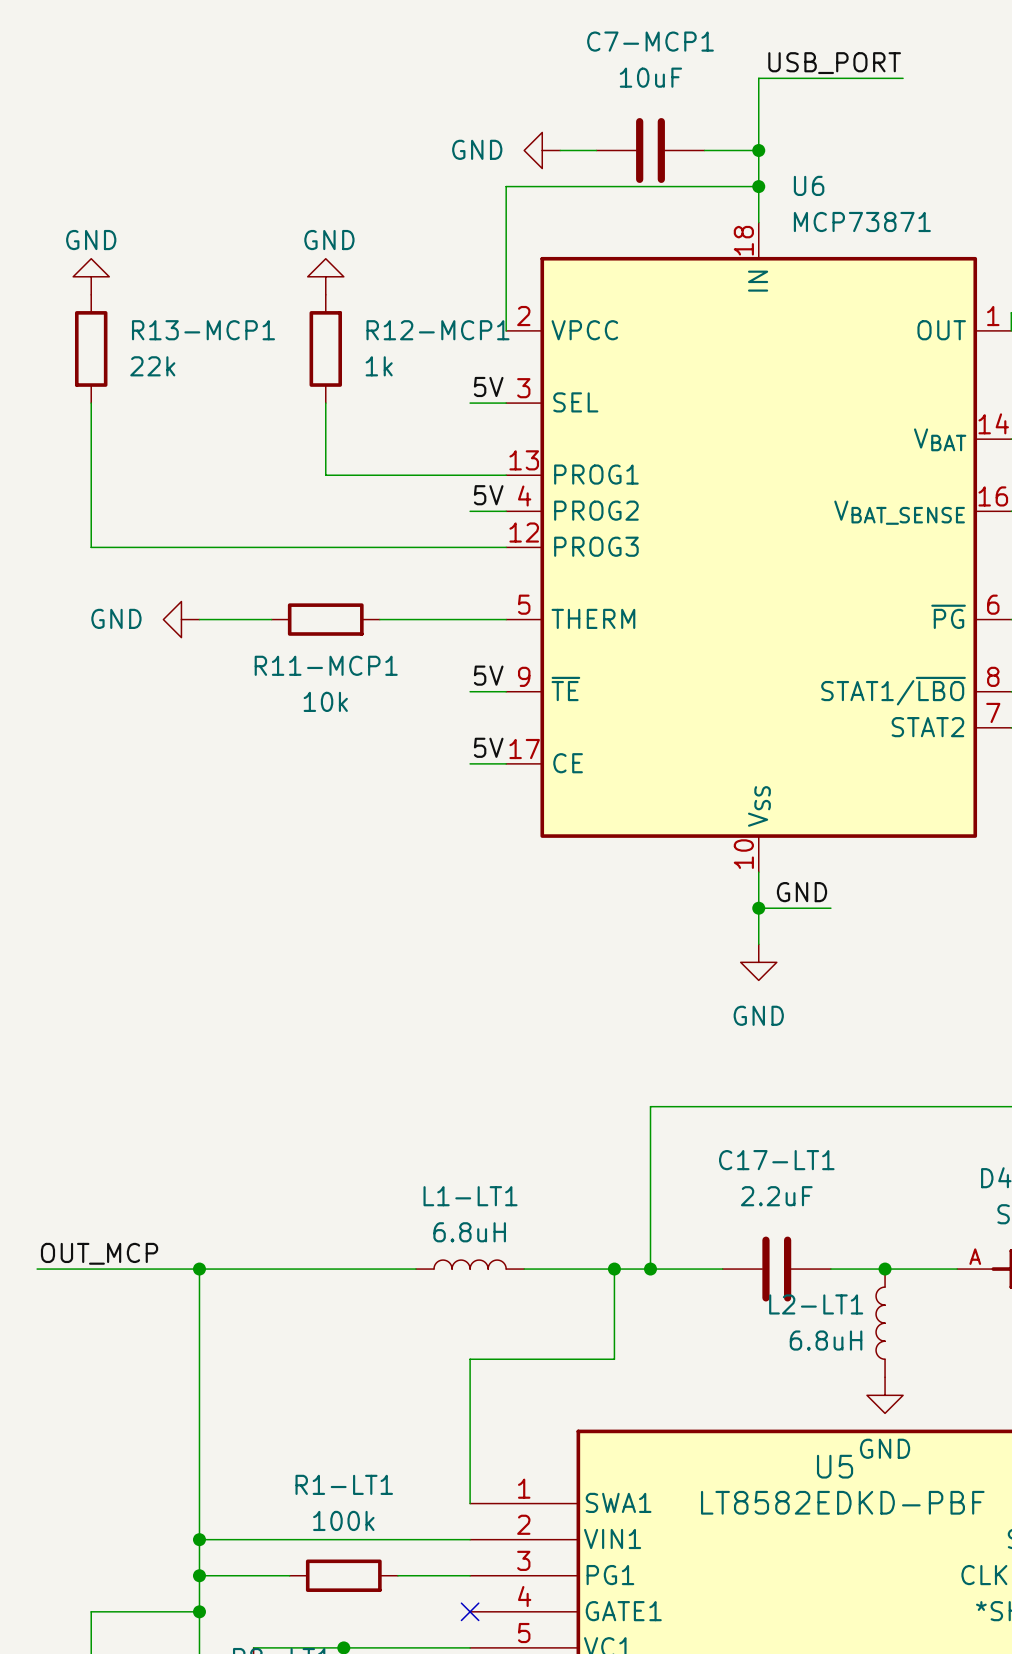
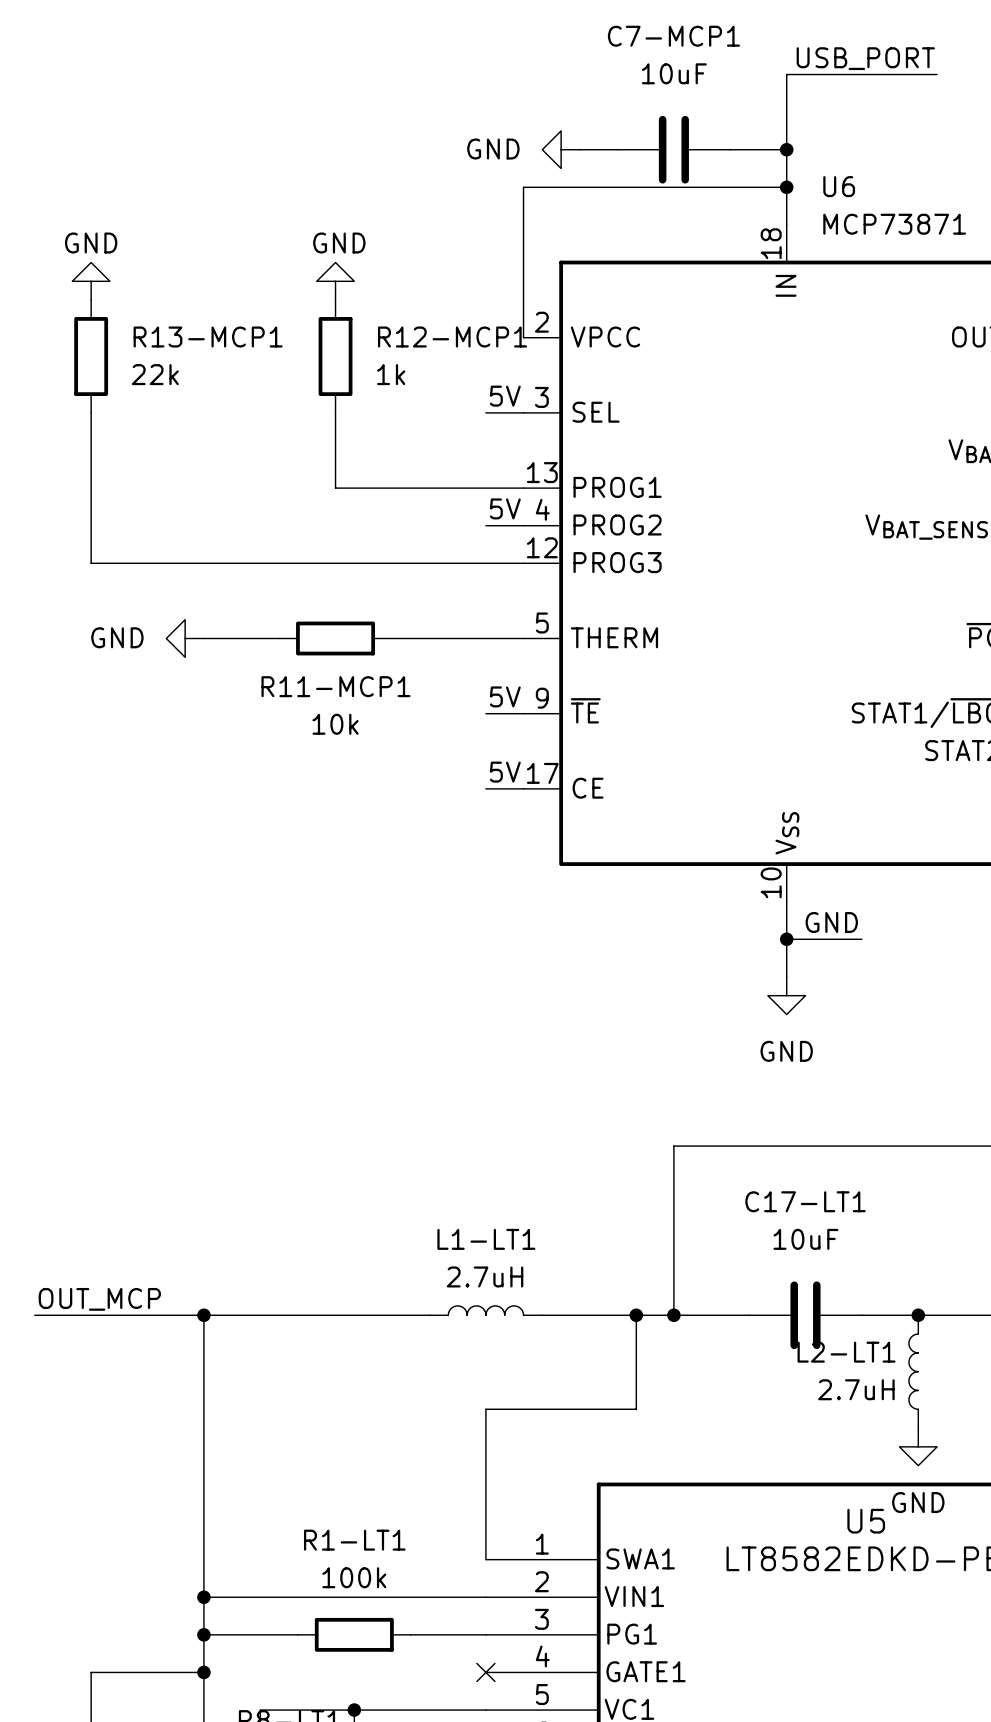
C17-LT1 value: 2.2uF (776, 1196) -> 10uF (805, 1239)
L1-LT1 value: 6.8uH (469, 1232) -> 2.7uH (485, 1276)
L2-LT1 value: 6.8uH (826, 1340) -> 2.7uH (856, 1389)

